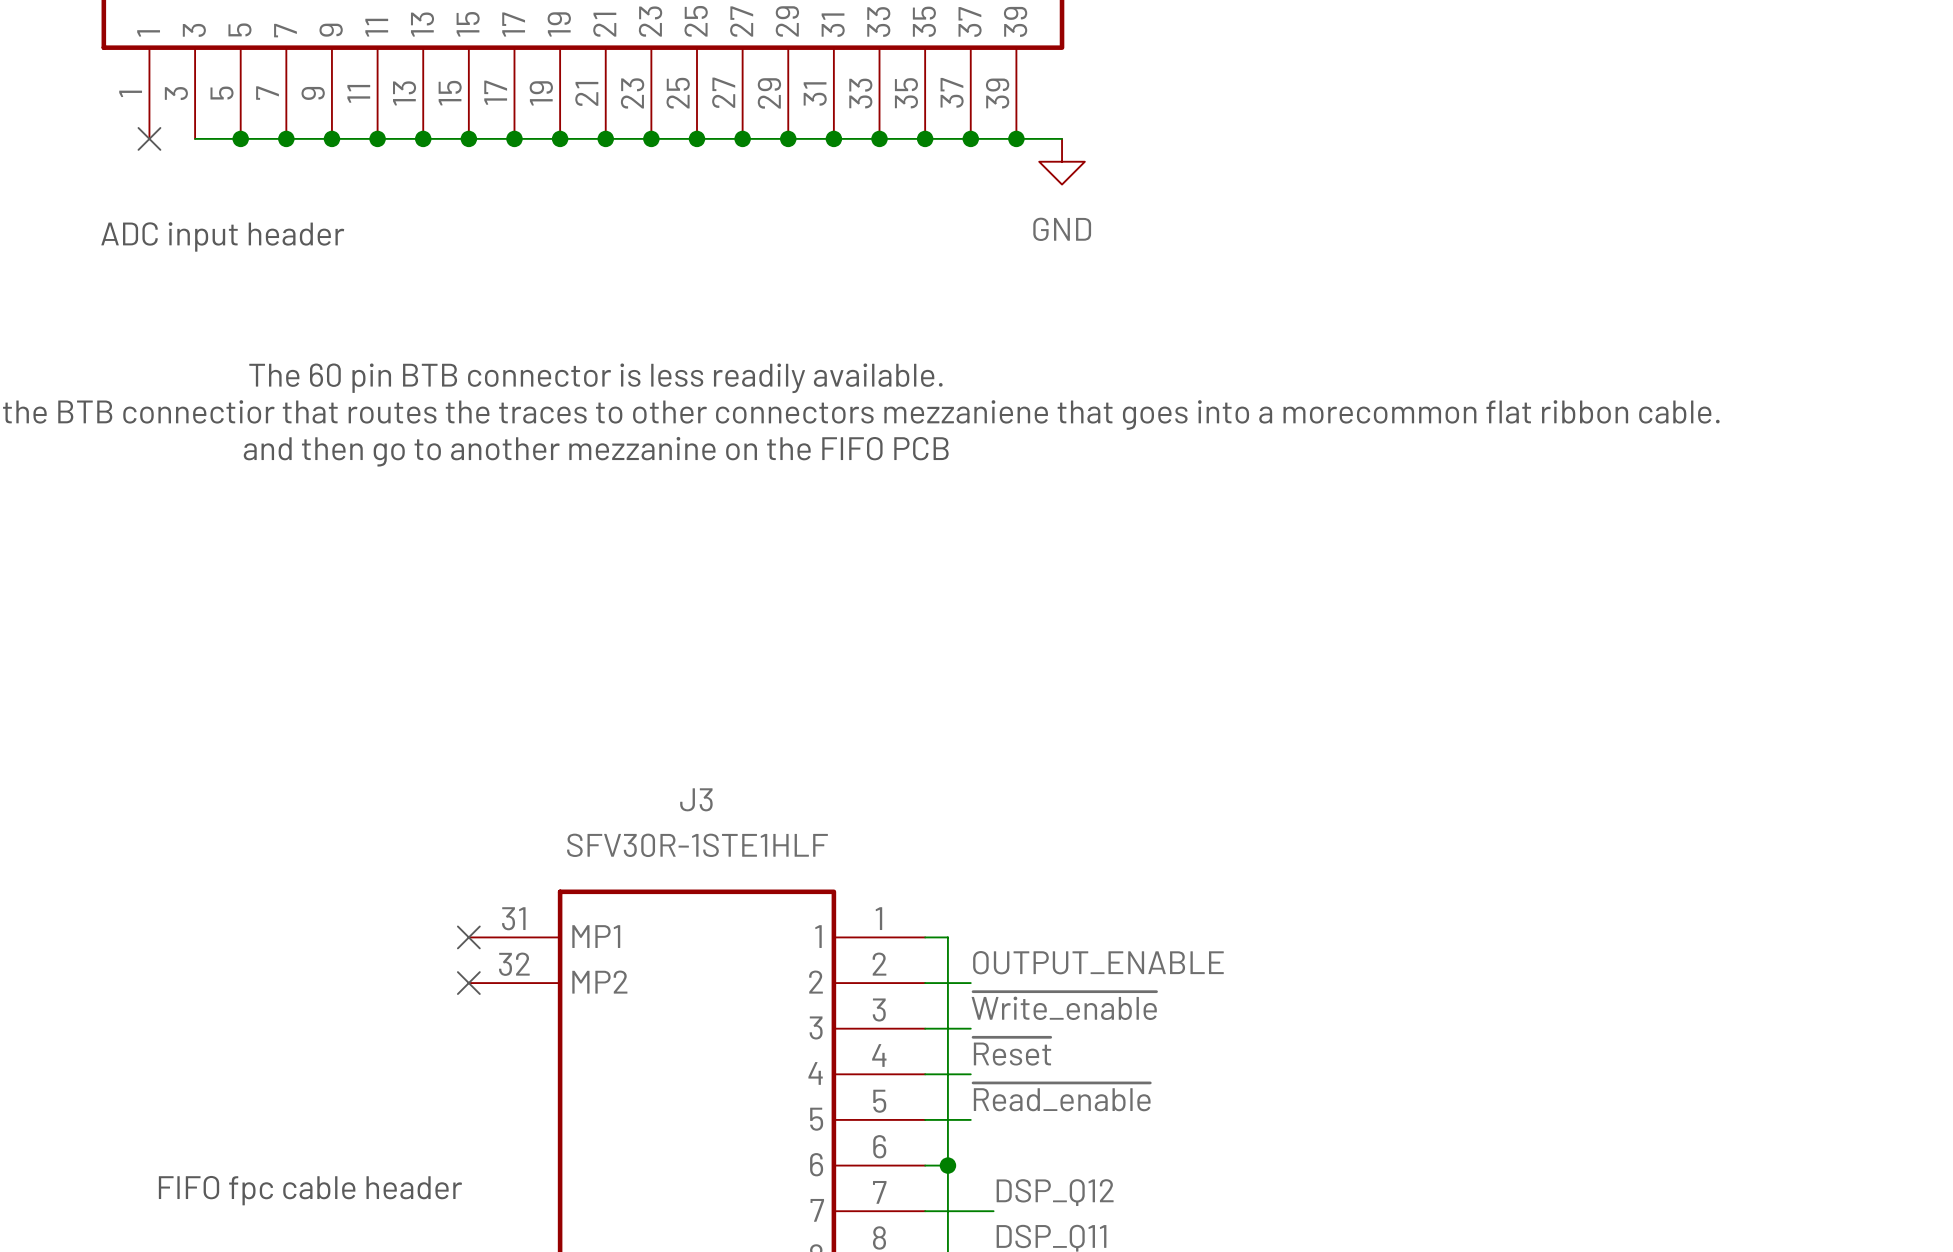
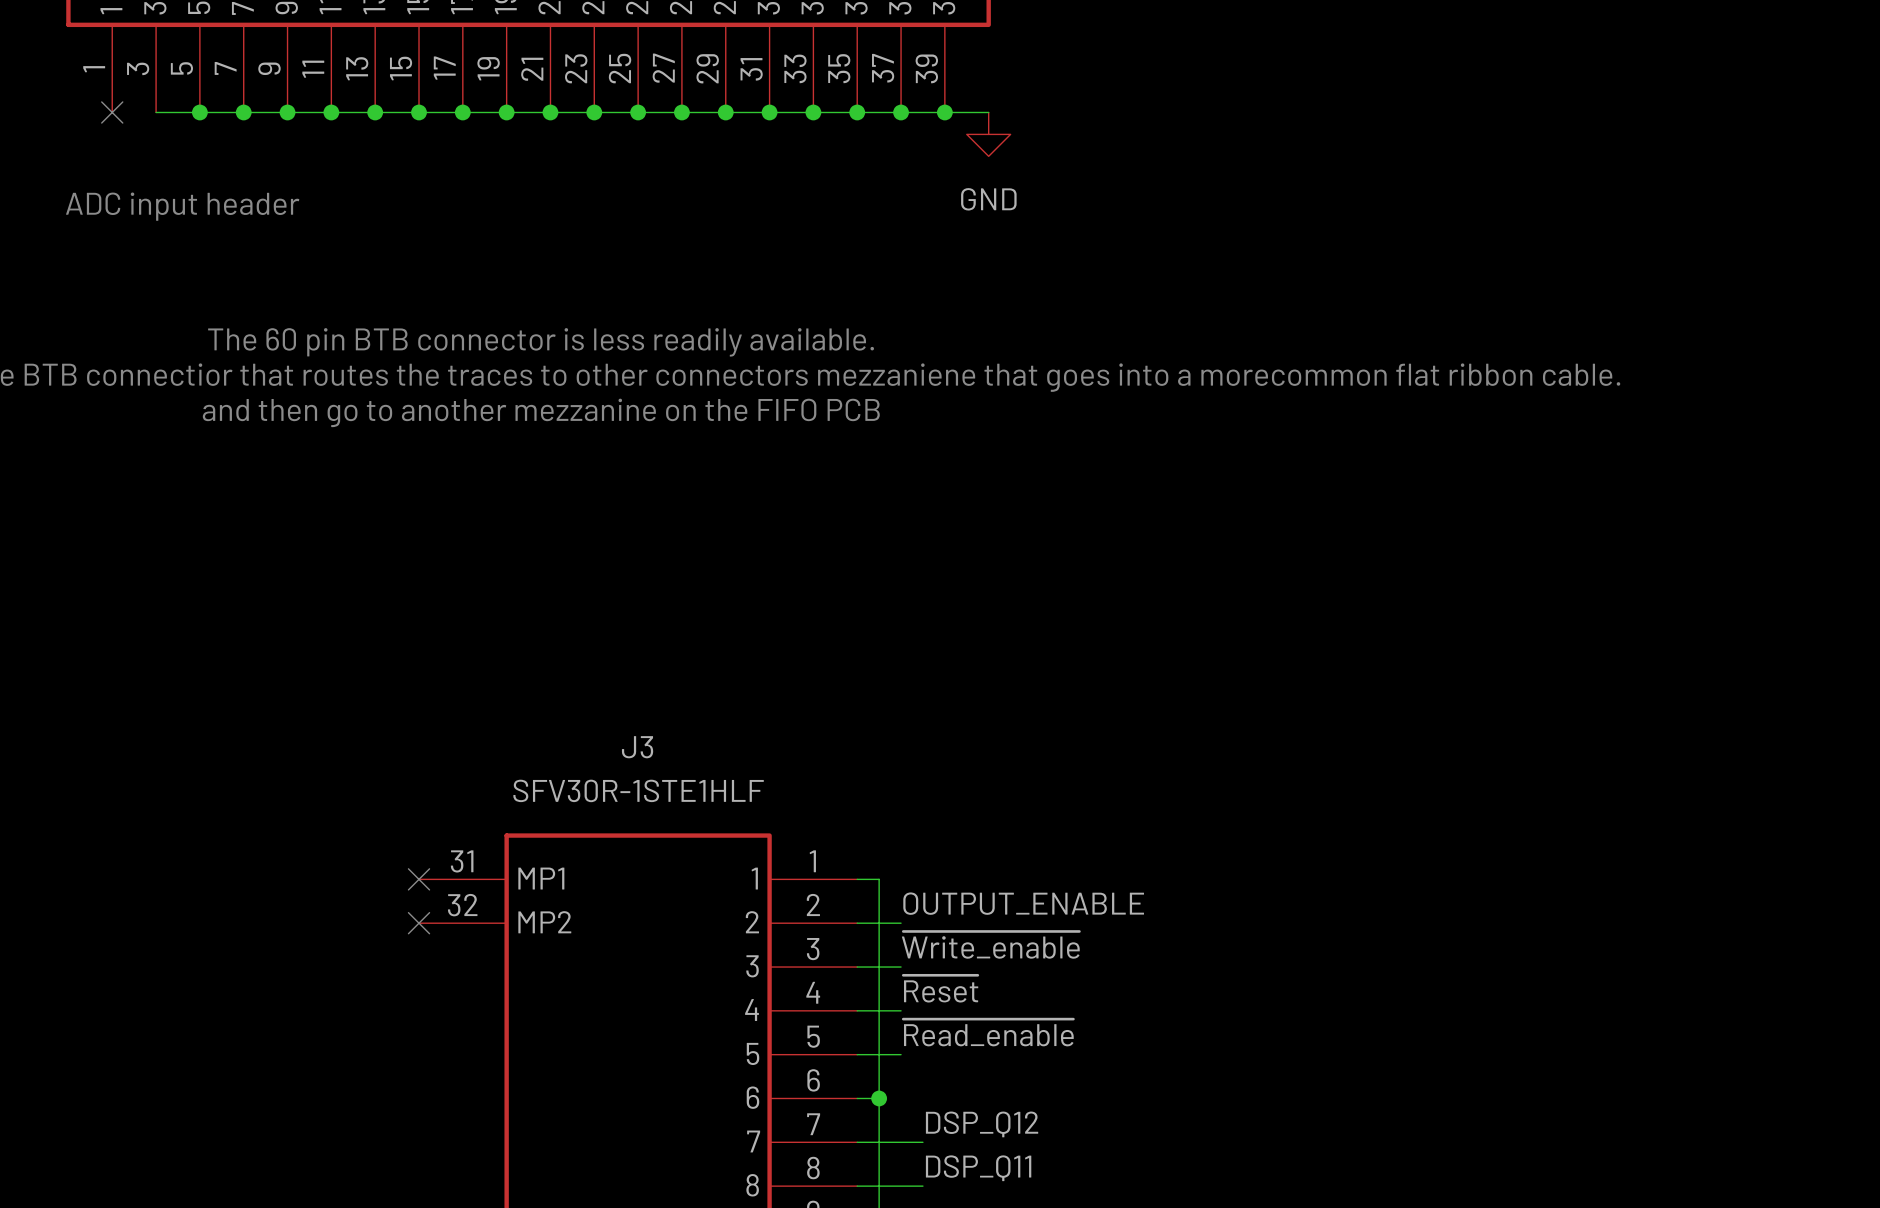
text: FIFO fpc cable header (310, 1190) -> none

